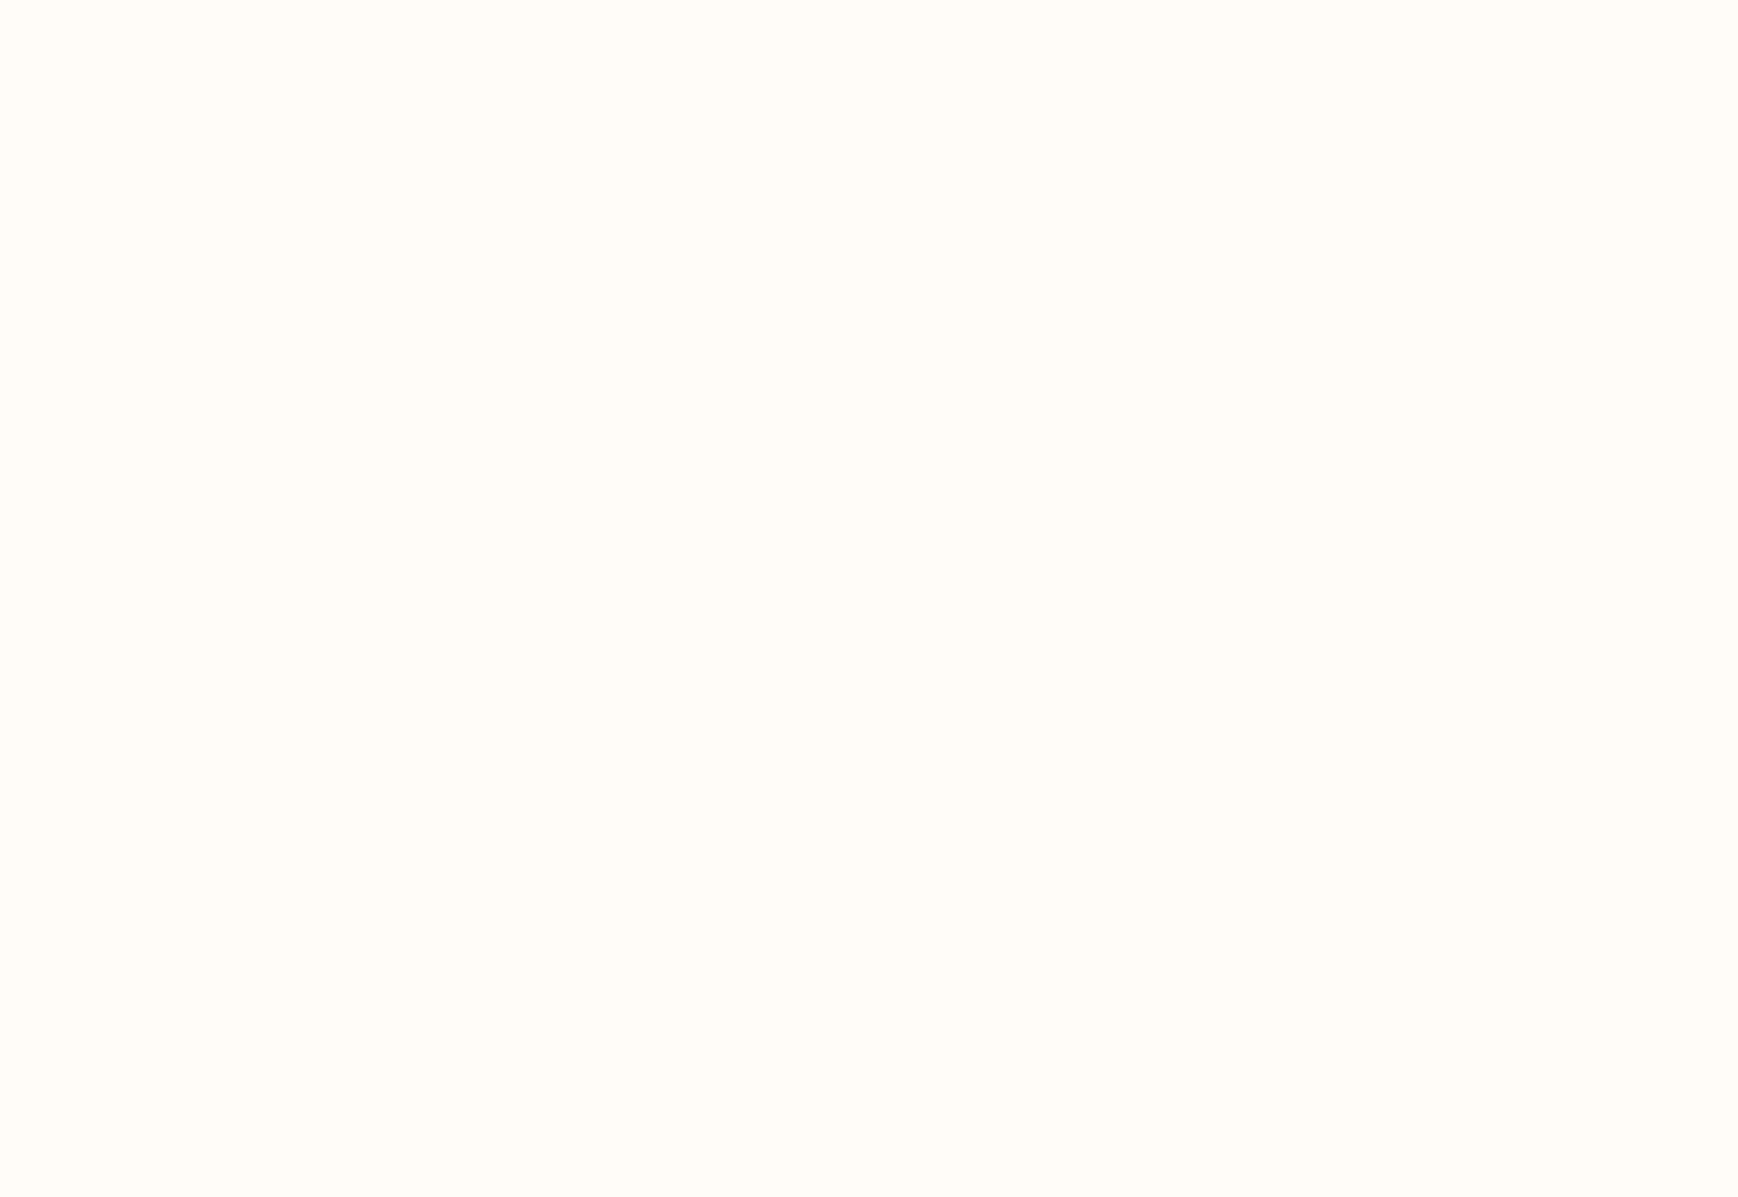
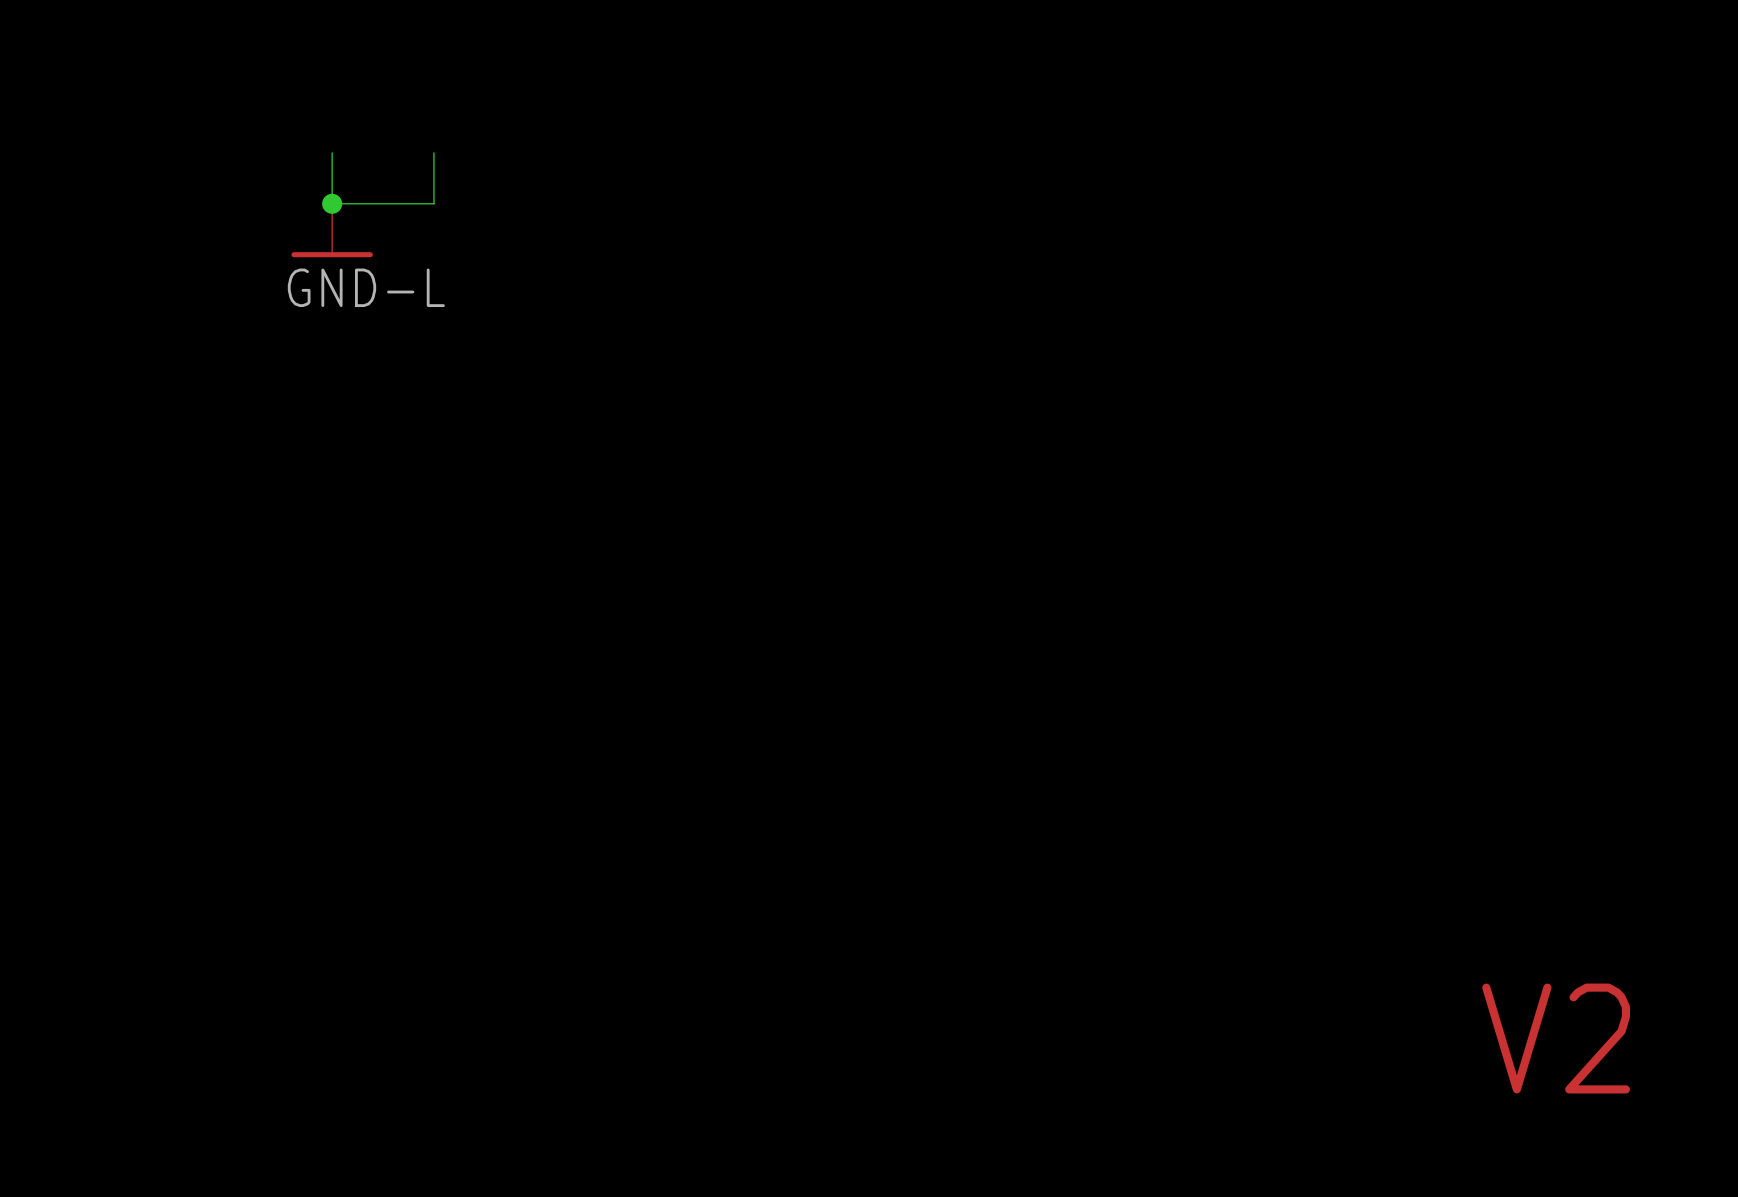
wire: none -> (332, 152) (332, 203) (433, 203) (433, 152)
junction: none -> (332, 203)
power symbol: none -> GND-L (332, 230)
text: none -> V2 (1556, 1038)

